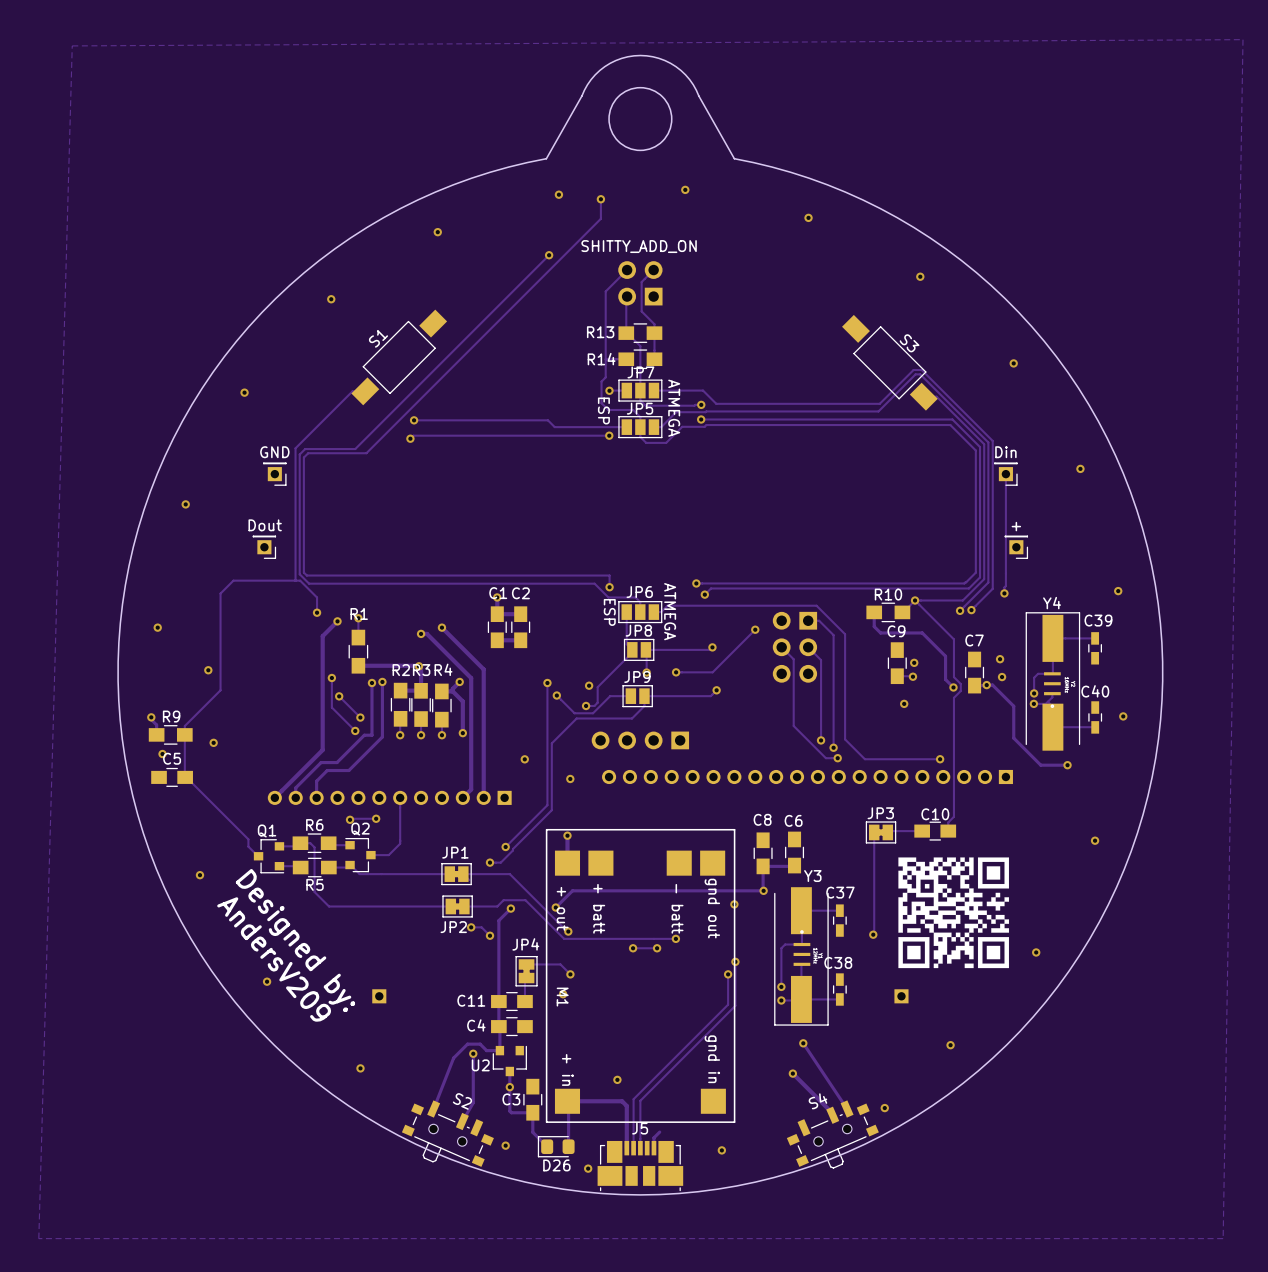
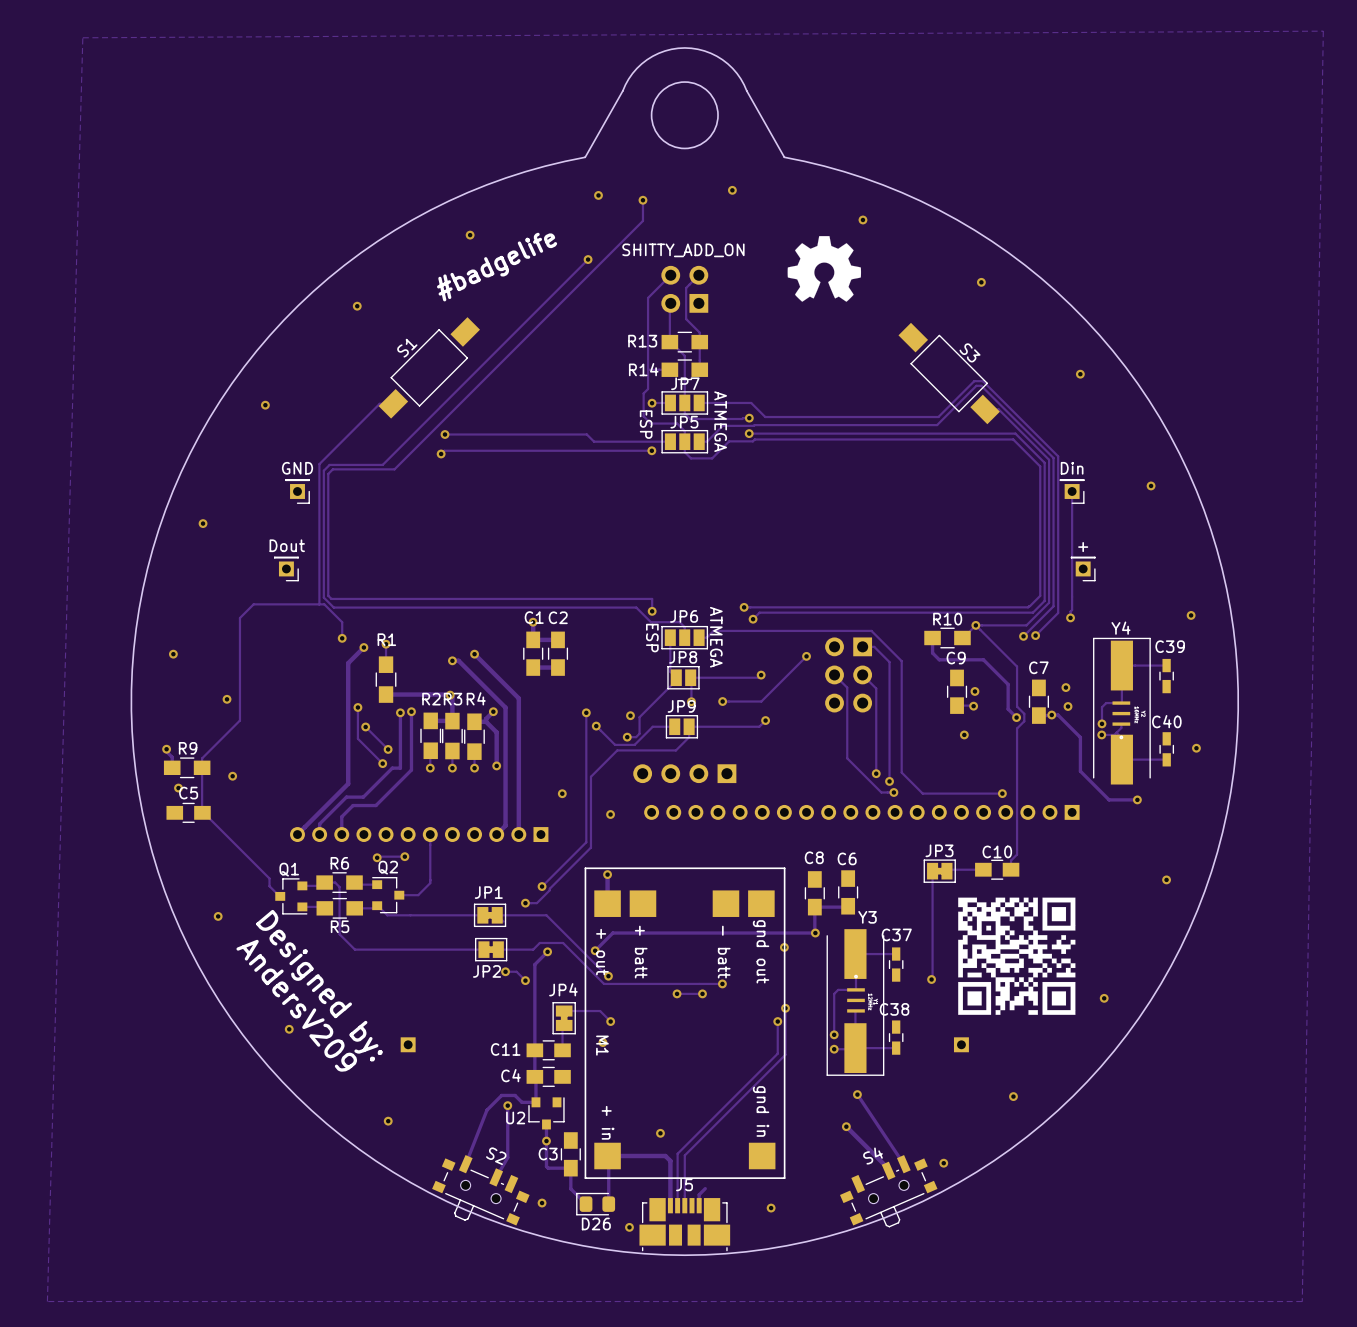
drawing: none -> [787, 236, 862, 302]
text: none -> #badgelife (497, 267)

